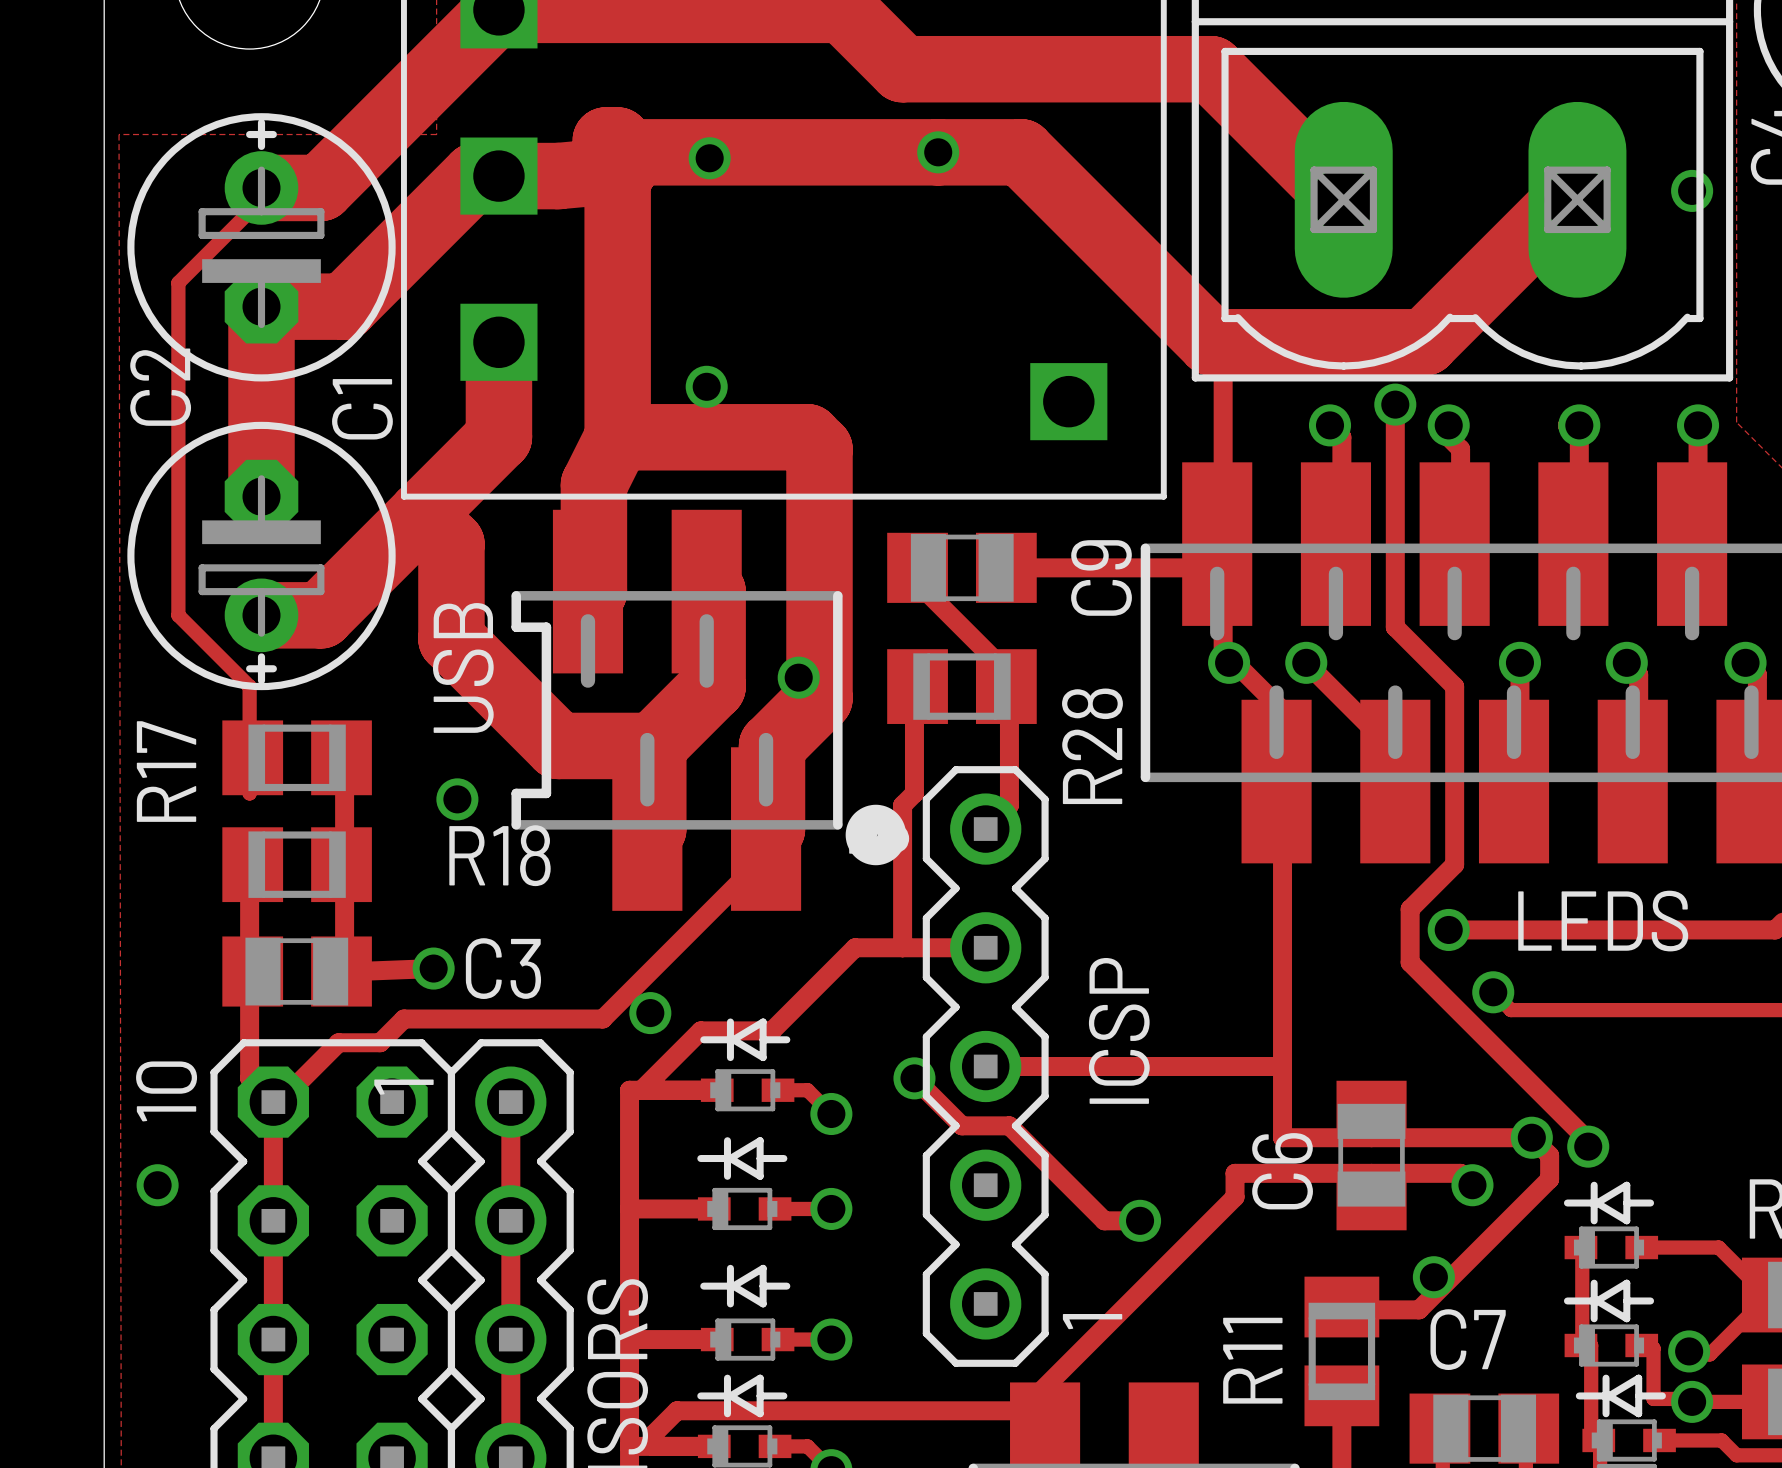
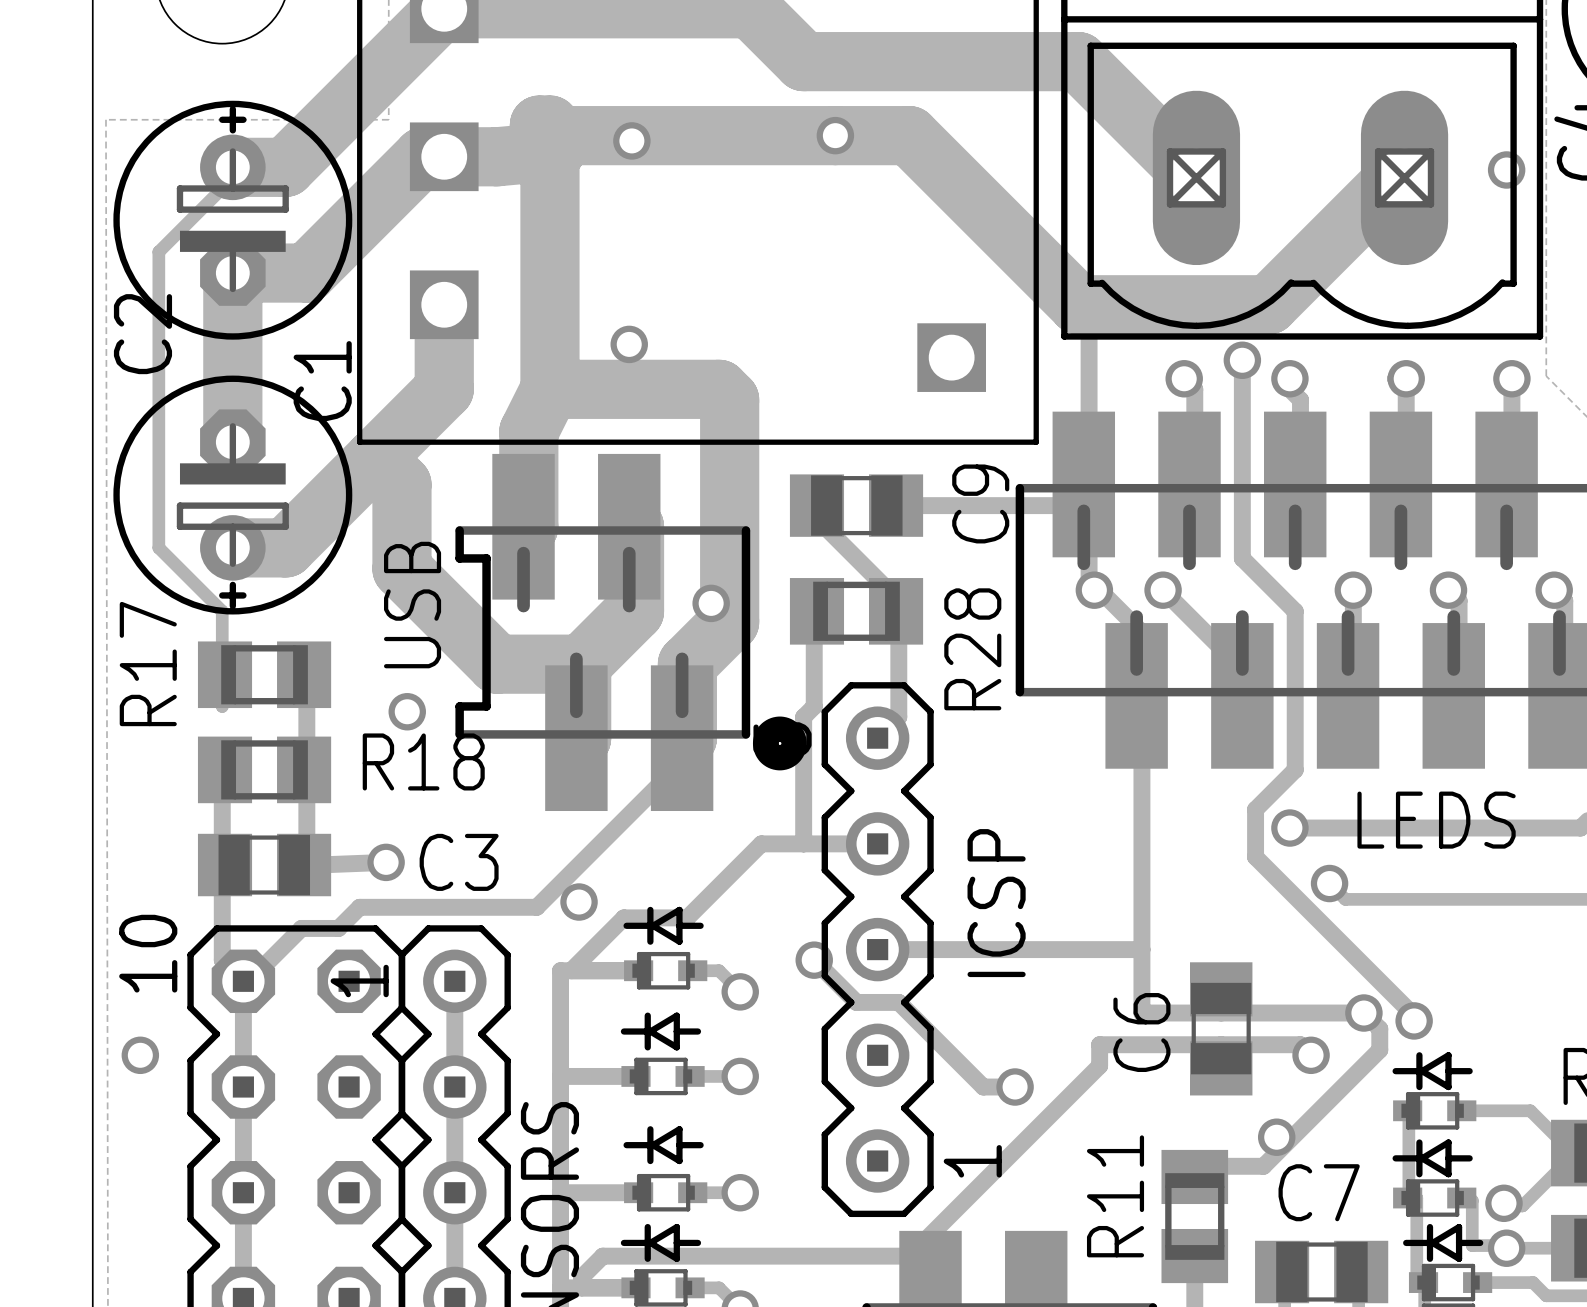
R11 position: (1341, 1351) -> (1194, 1216)

